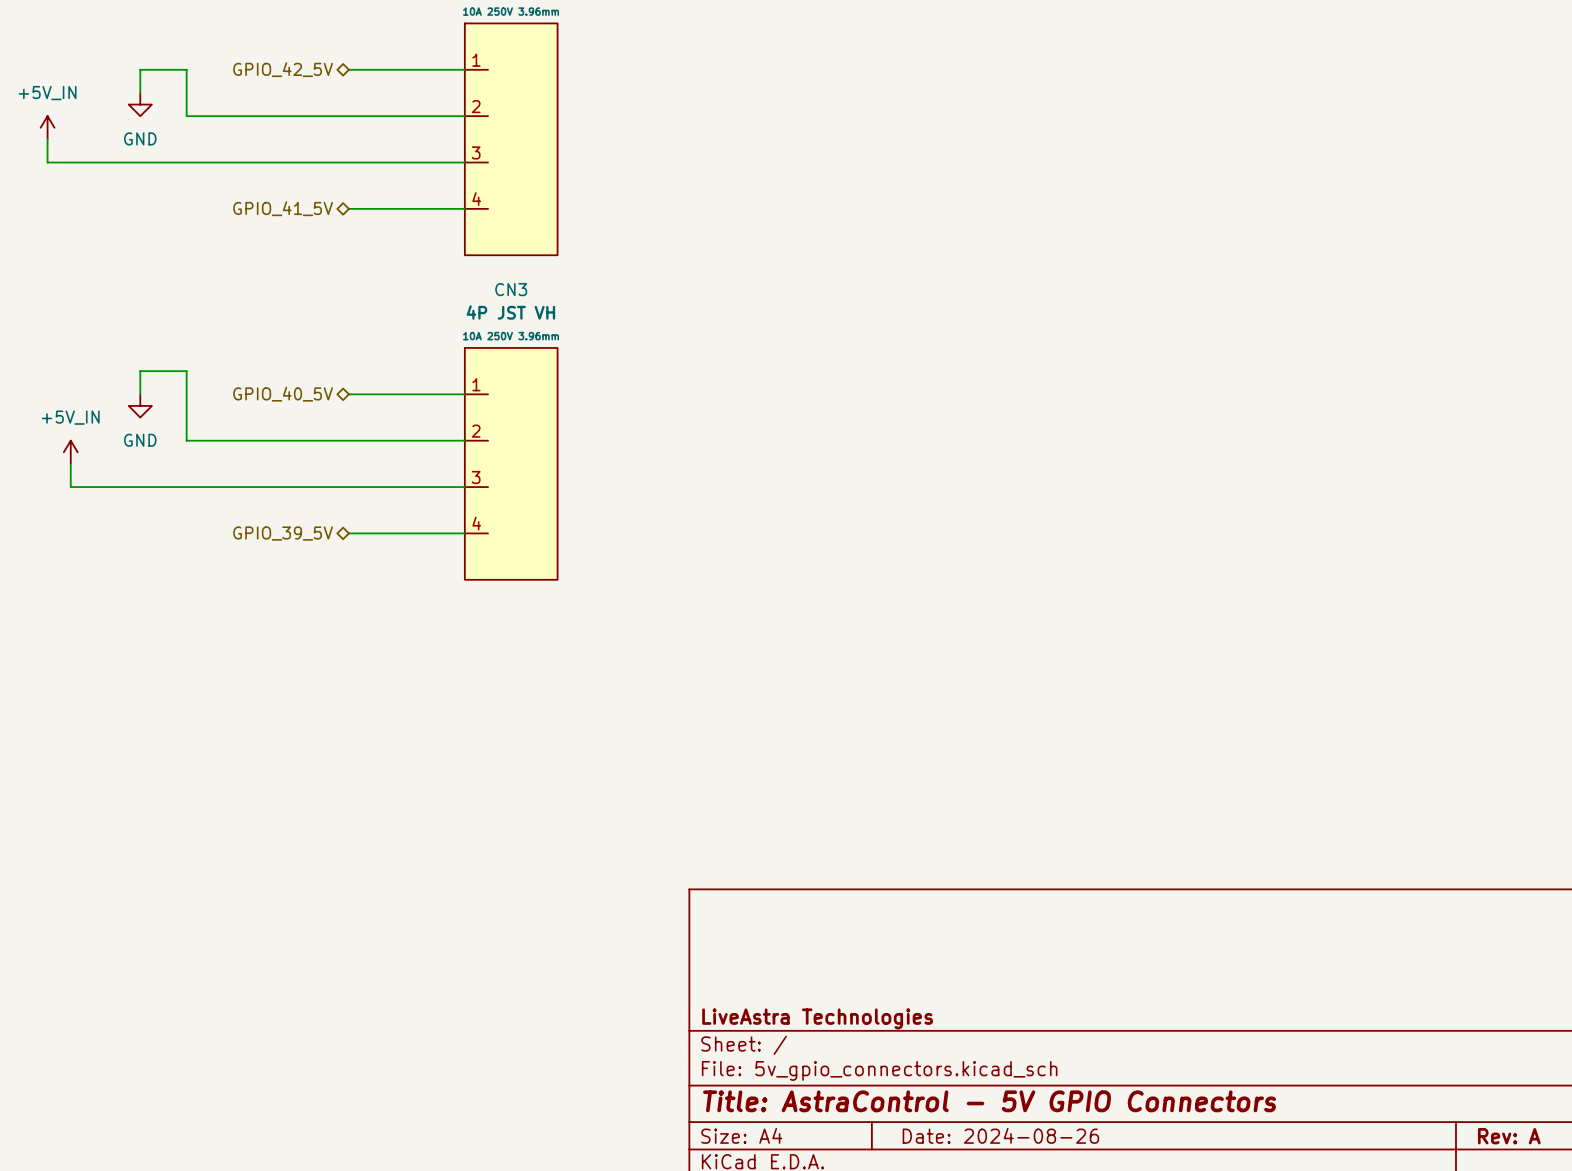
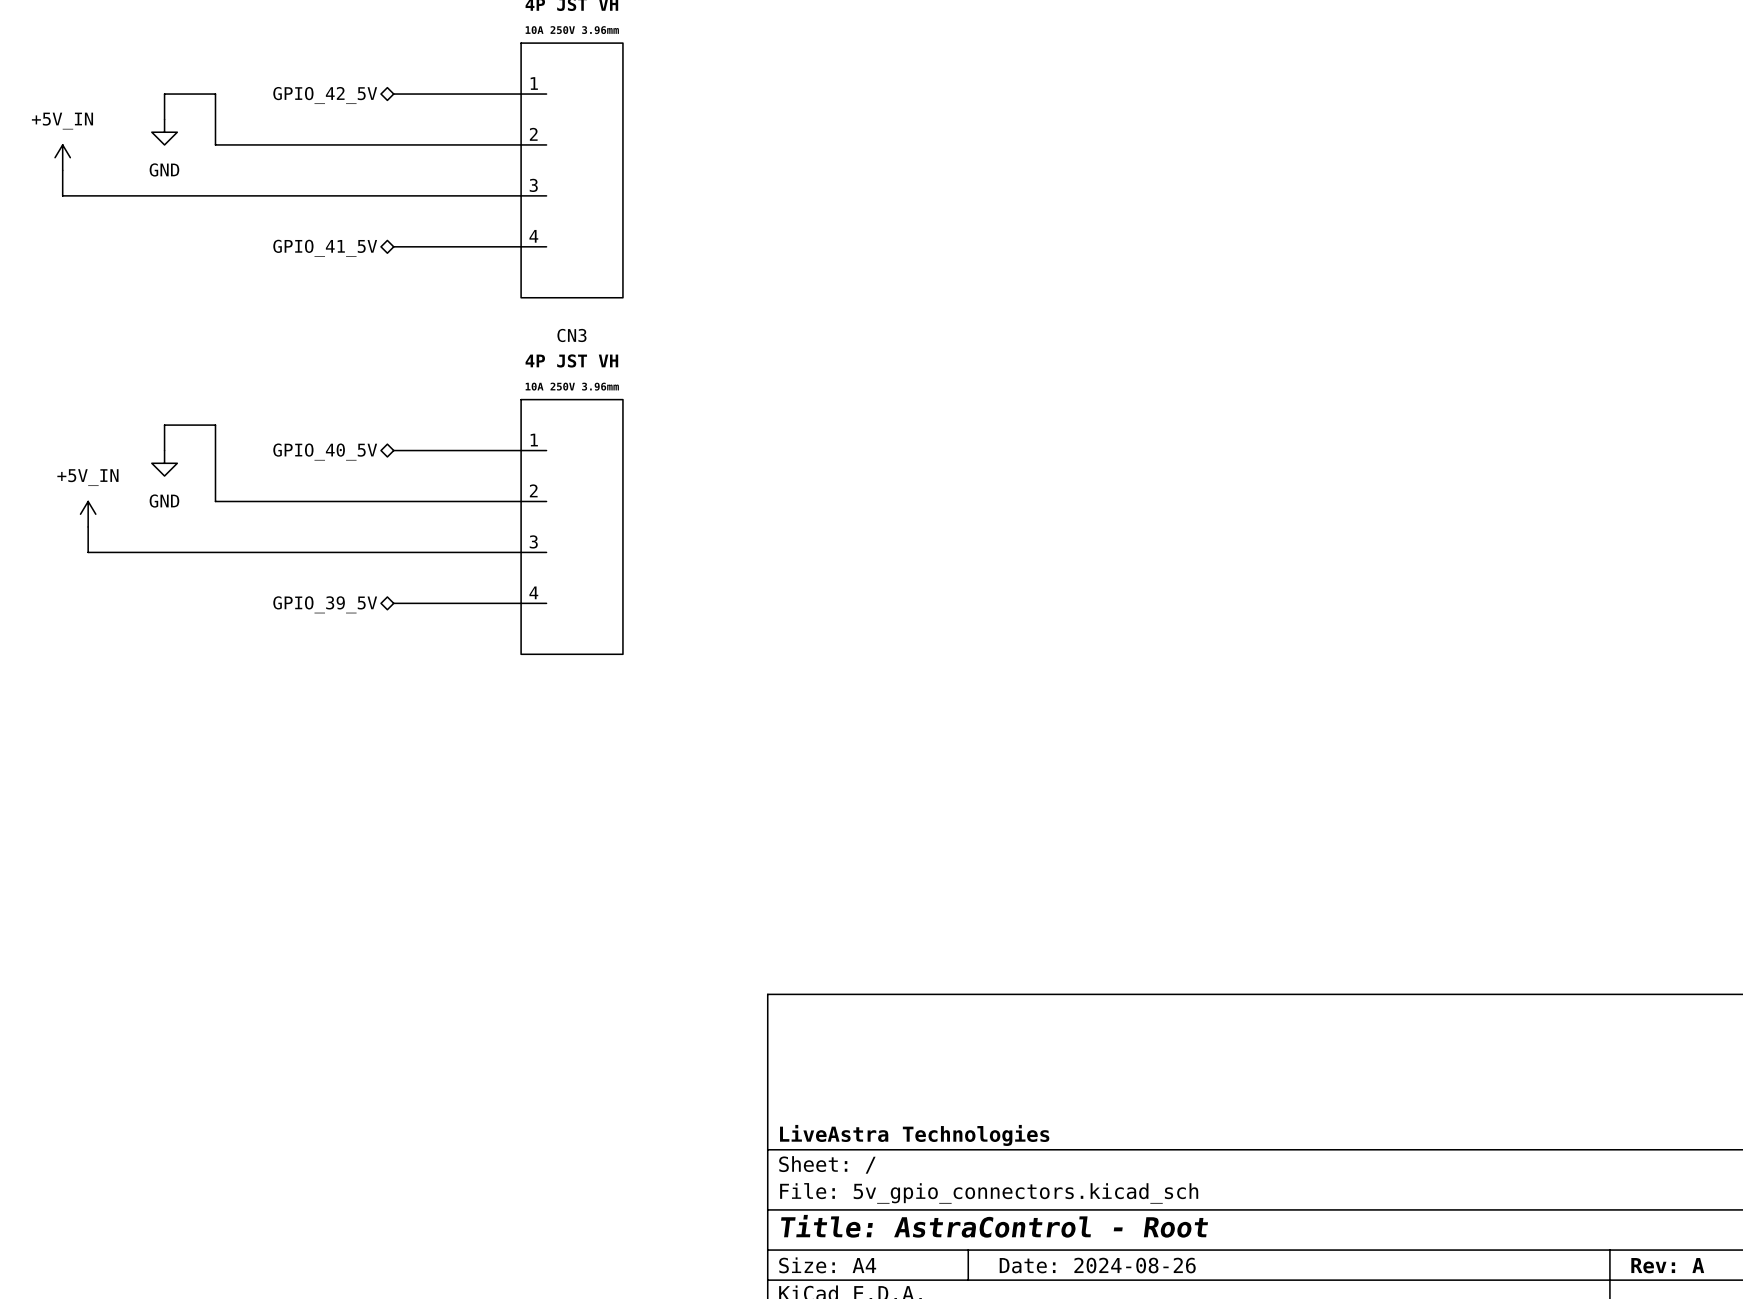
title block: Title: AstraControl - 5V GPIO Connectors (989, 1101) -> Title: AstraControl - Root (994, 1226)

